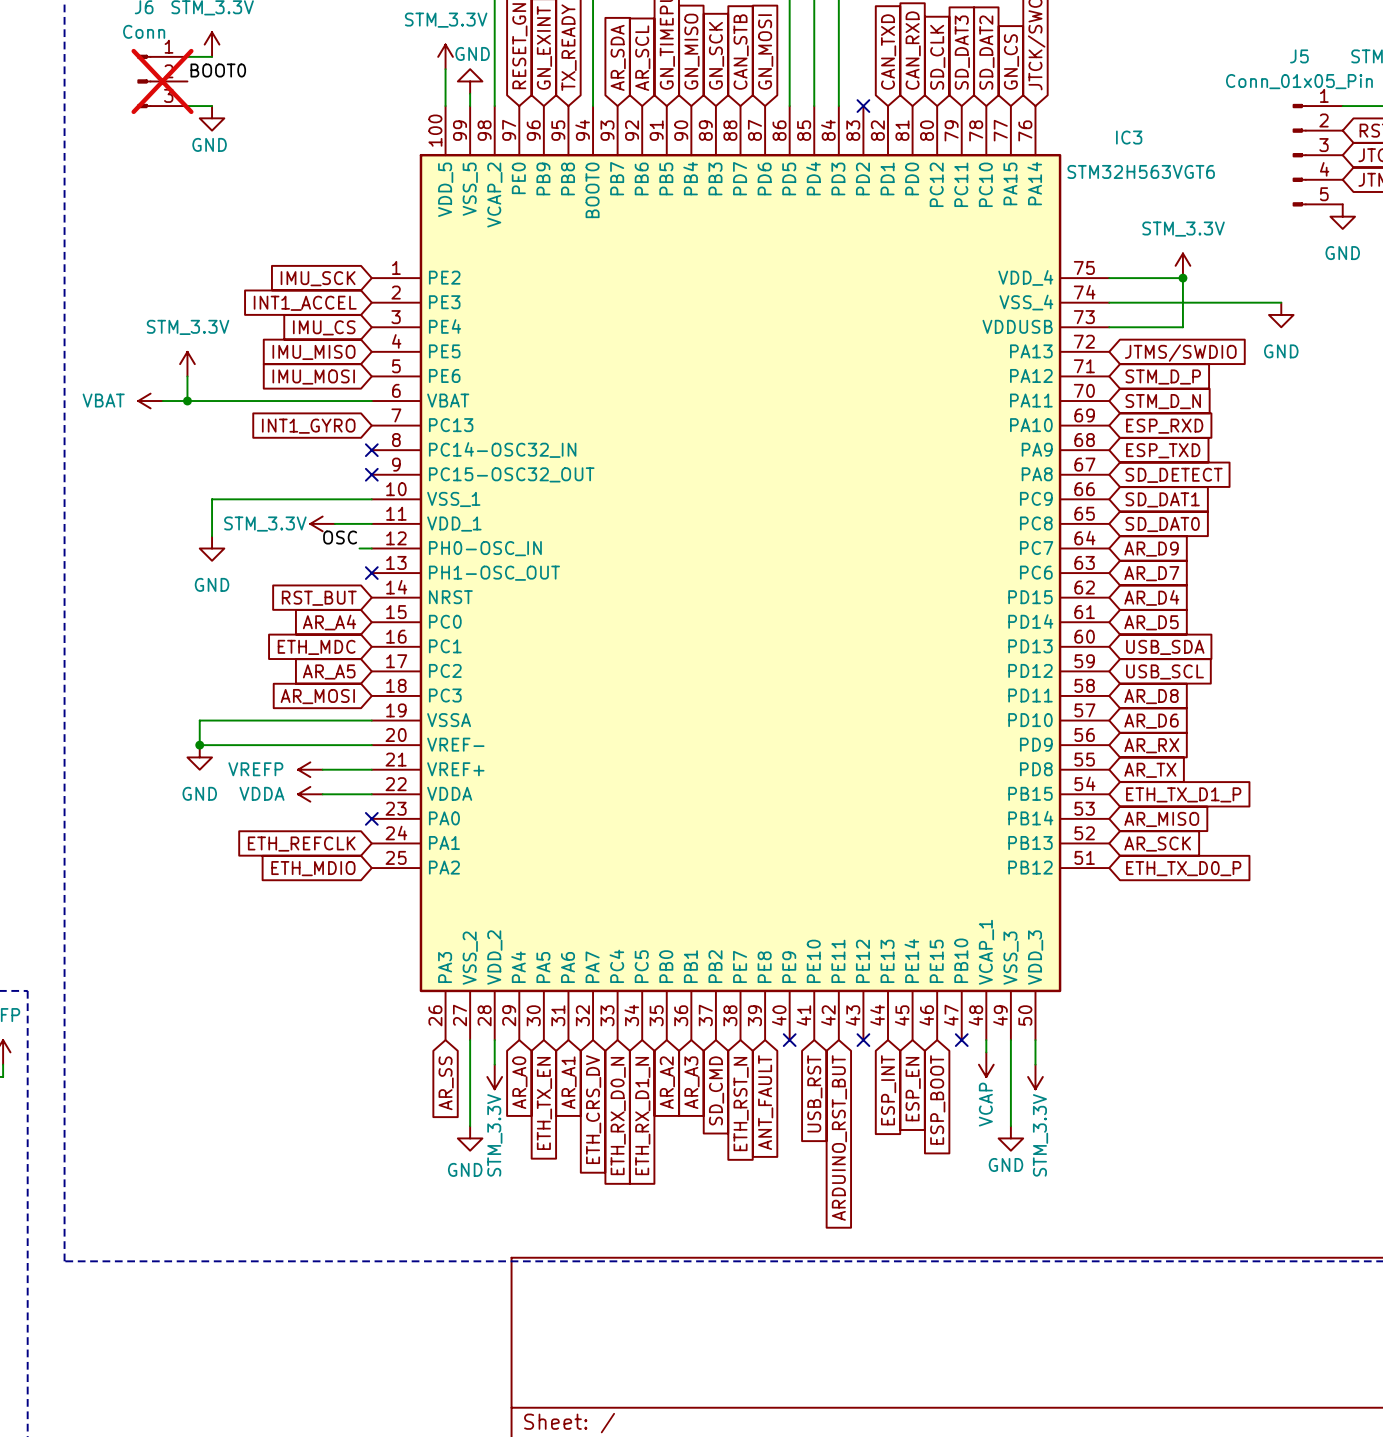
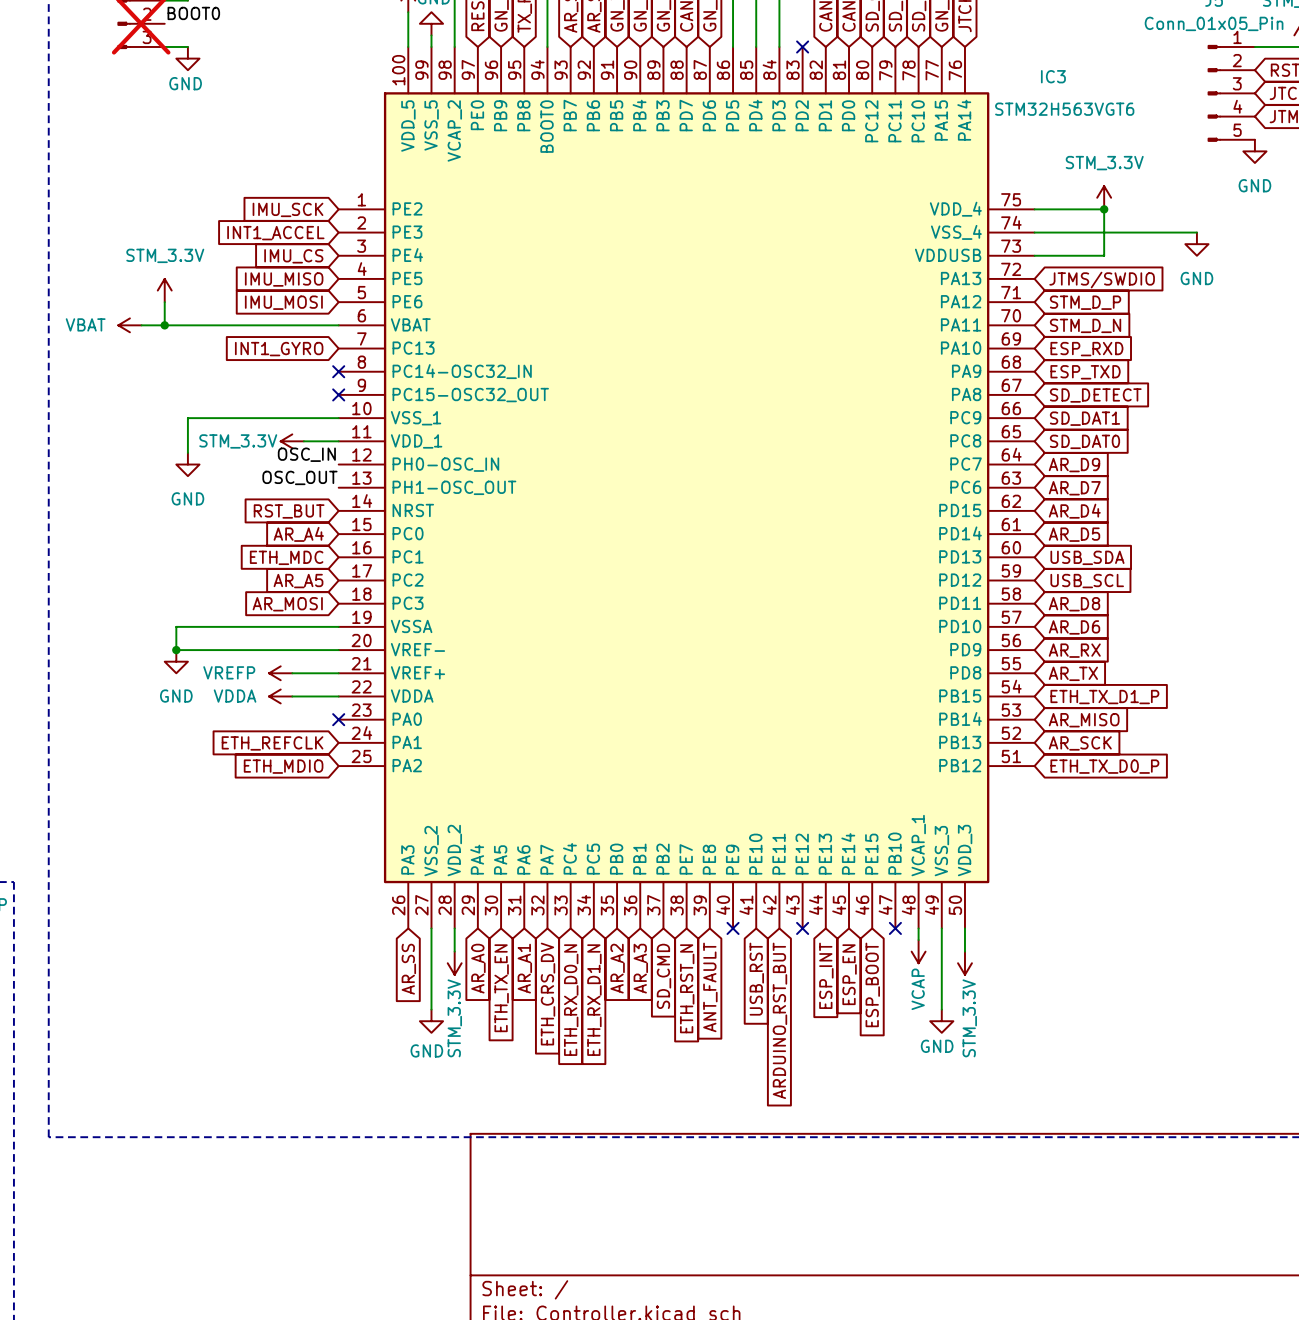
label: OSC (340, 537) -> OSC_IN (306, 454)
wire: (359, 548) (371, 548) -> none
label: none -> OSC_OUT (299, 477)
no-connect mark: (371, 573) -> none

